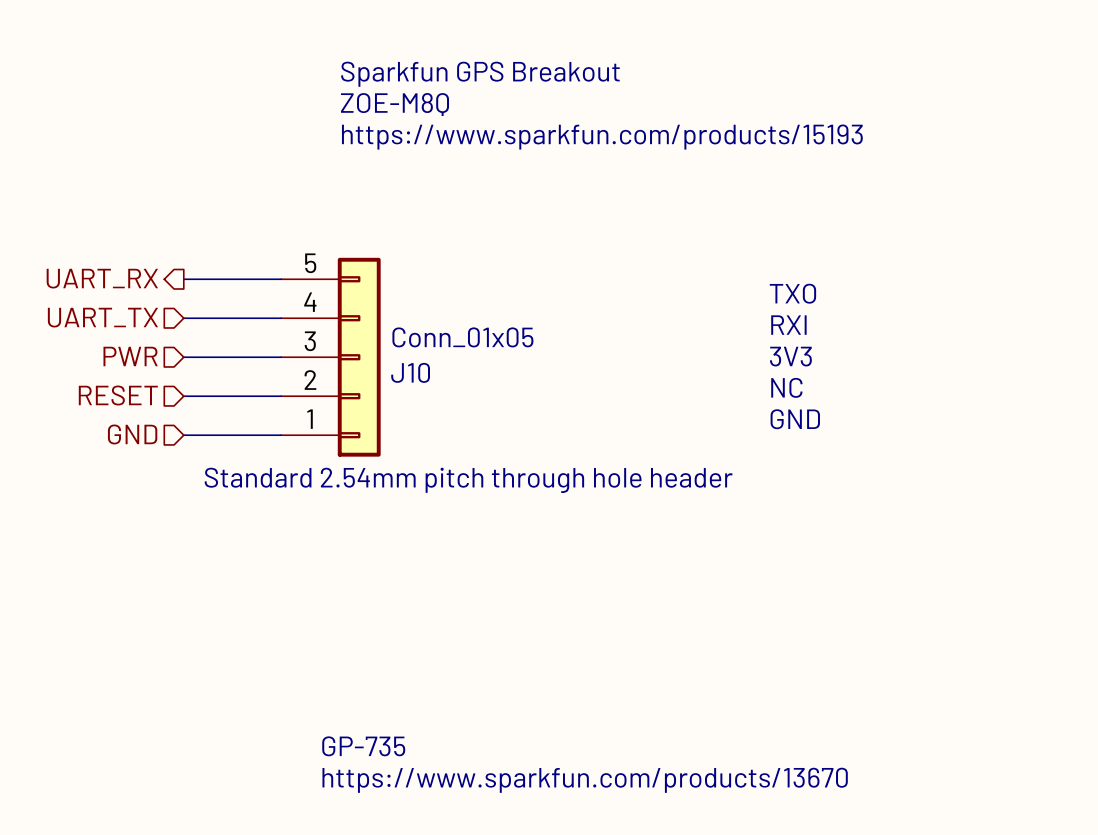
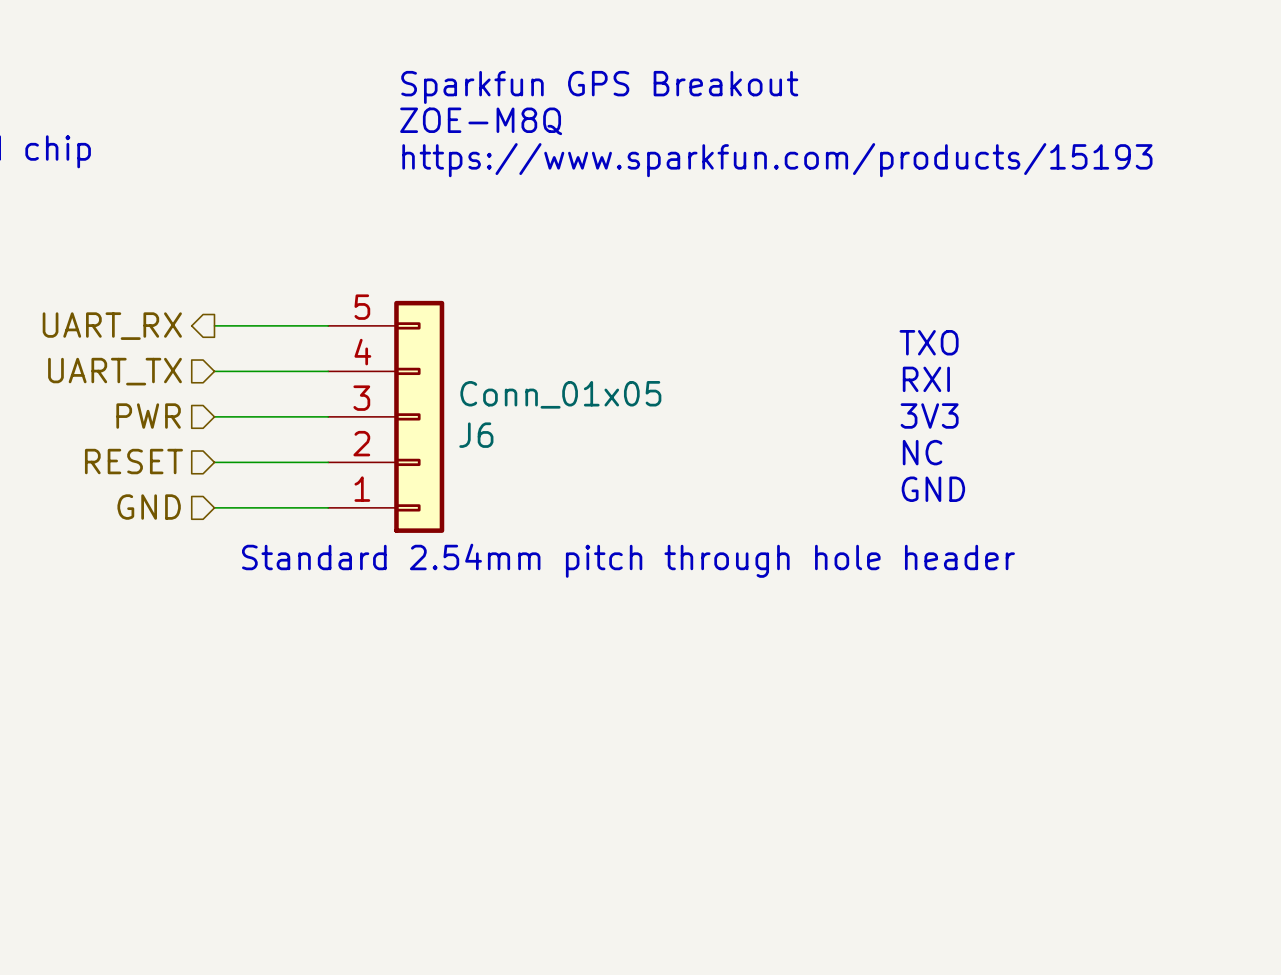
J10 name: J10 (410, 372) -> J6 (476, 435)
text: GP-735 (363, 746) -> none
text: https://www.sparkfun.com/products/13670 (585, 780) -> none

